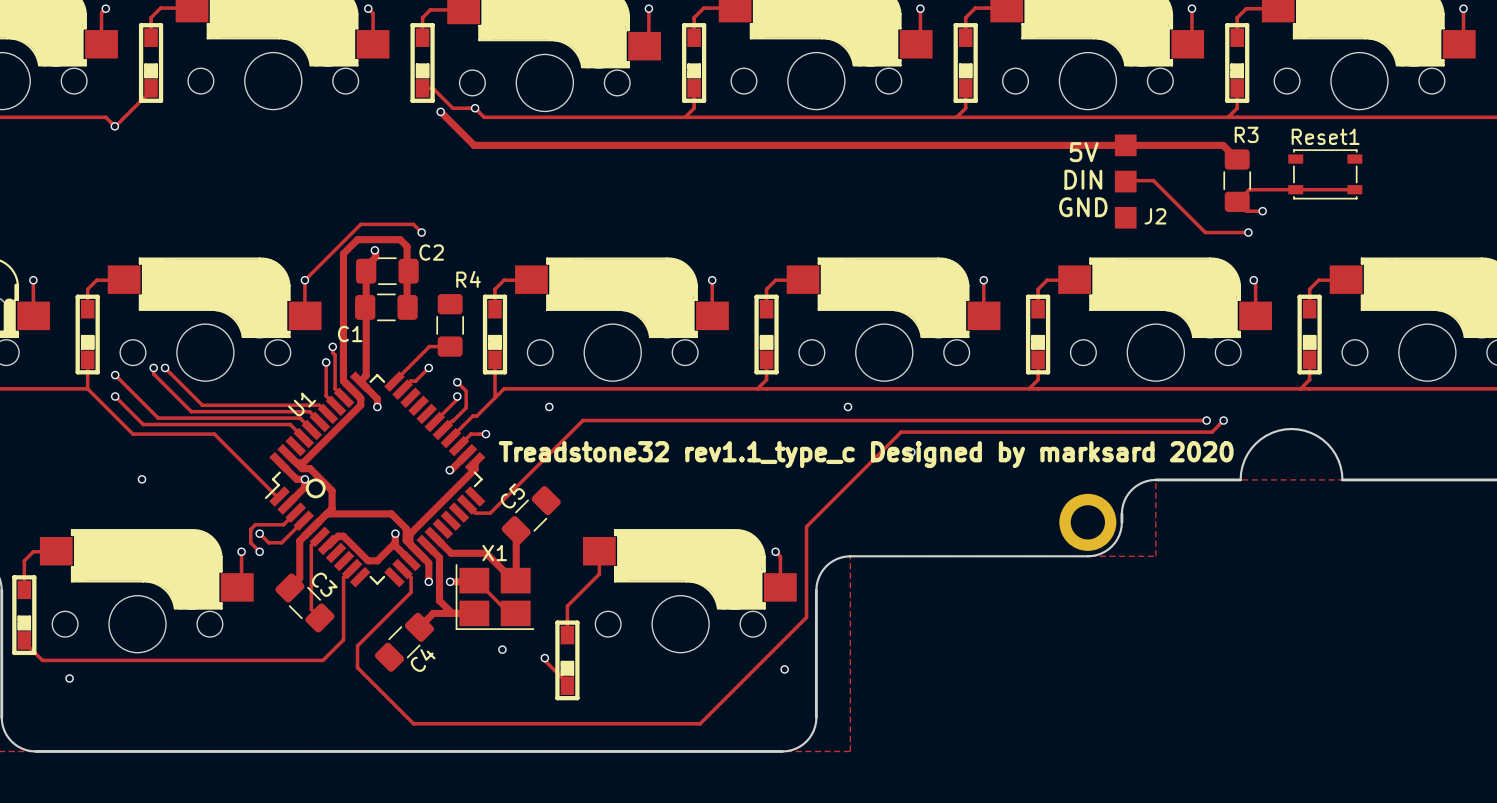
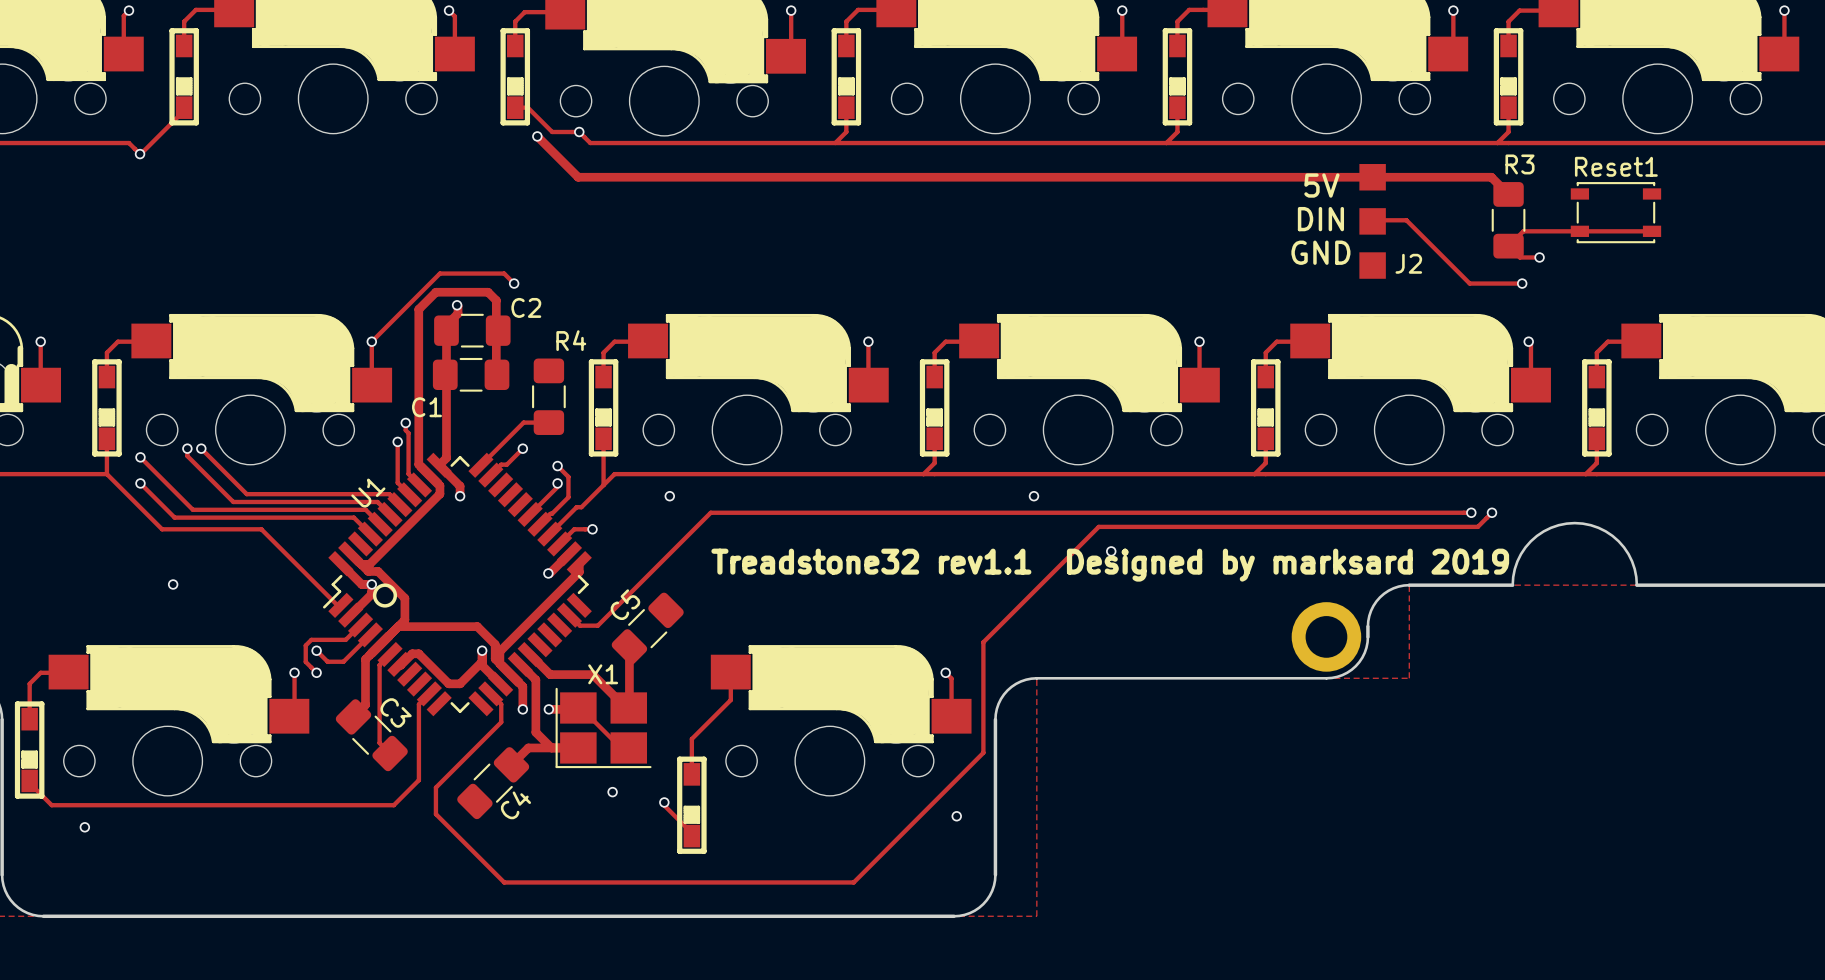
text: Treadstone32 rev1.1_type_c Designed by marksard 2020 (866, 454) -> Treadstone32 rev1.1 Designed by marksard 2019 (1110, 565)

